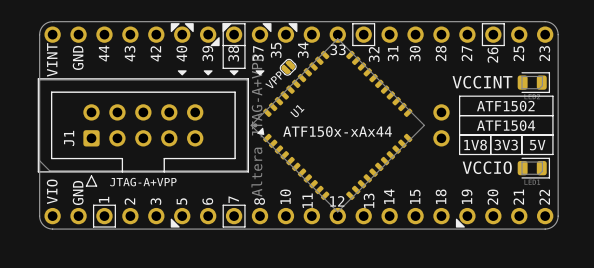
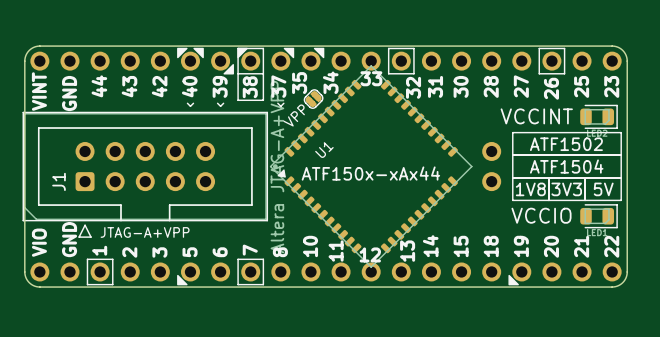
drawing: [177, 70, 187, 76] -> none
line: none -> (187, 103) (190, 106) (193, 103)
drawing: [203, 70, 213, 76] -> none
line: none -> (217, 103) (220, 106) (223, 103)
drawing: [229, 70, 239, 76] -> none
drawing: [255, 70, 265, 76] -> none
line: none -> (277, 103) (280, 106) (283, 103)

